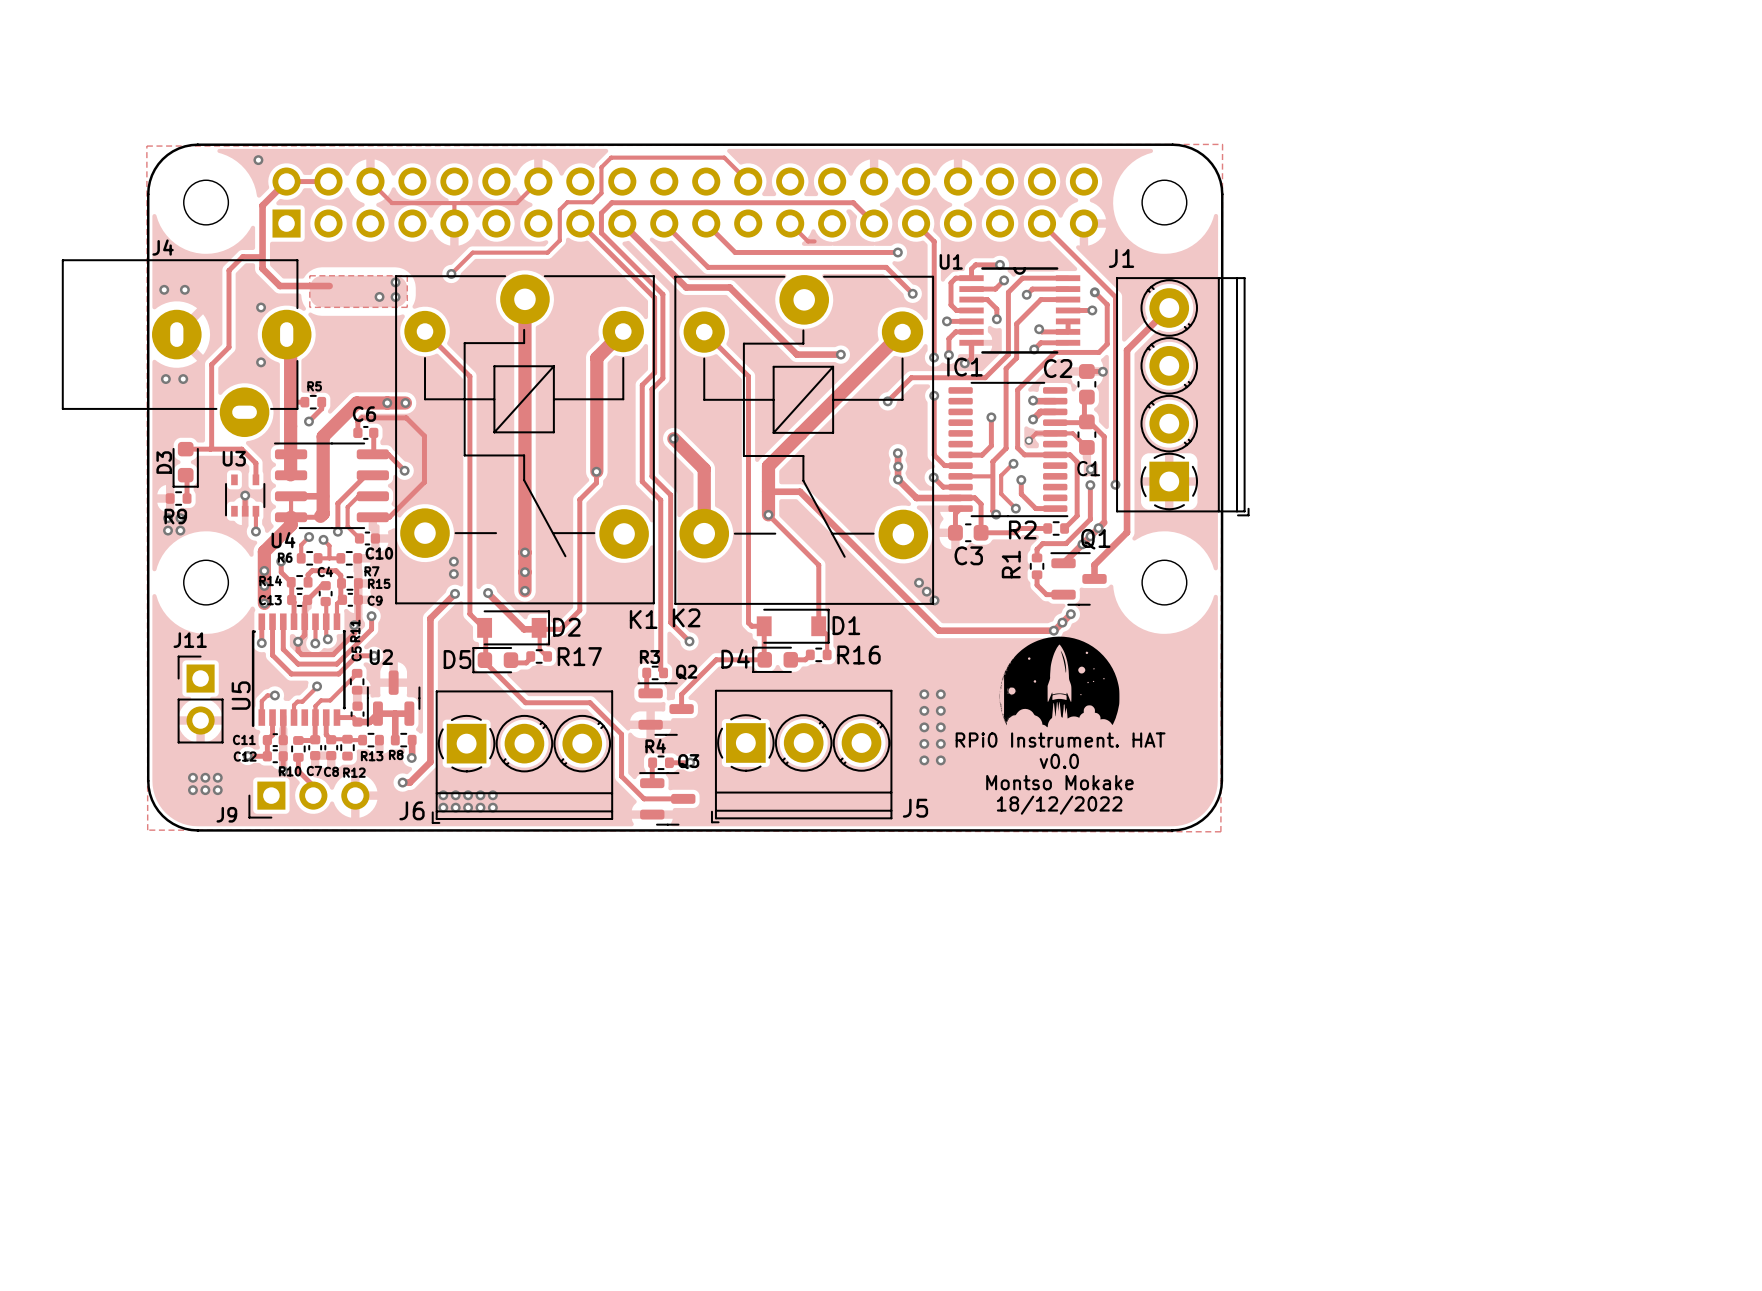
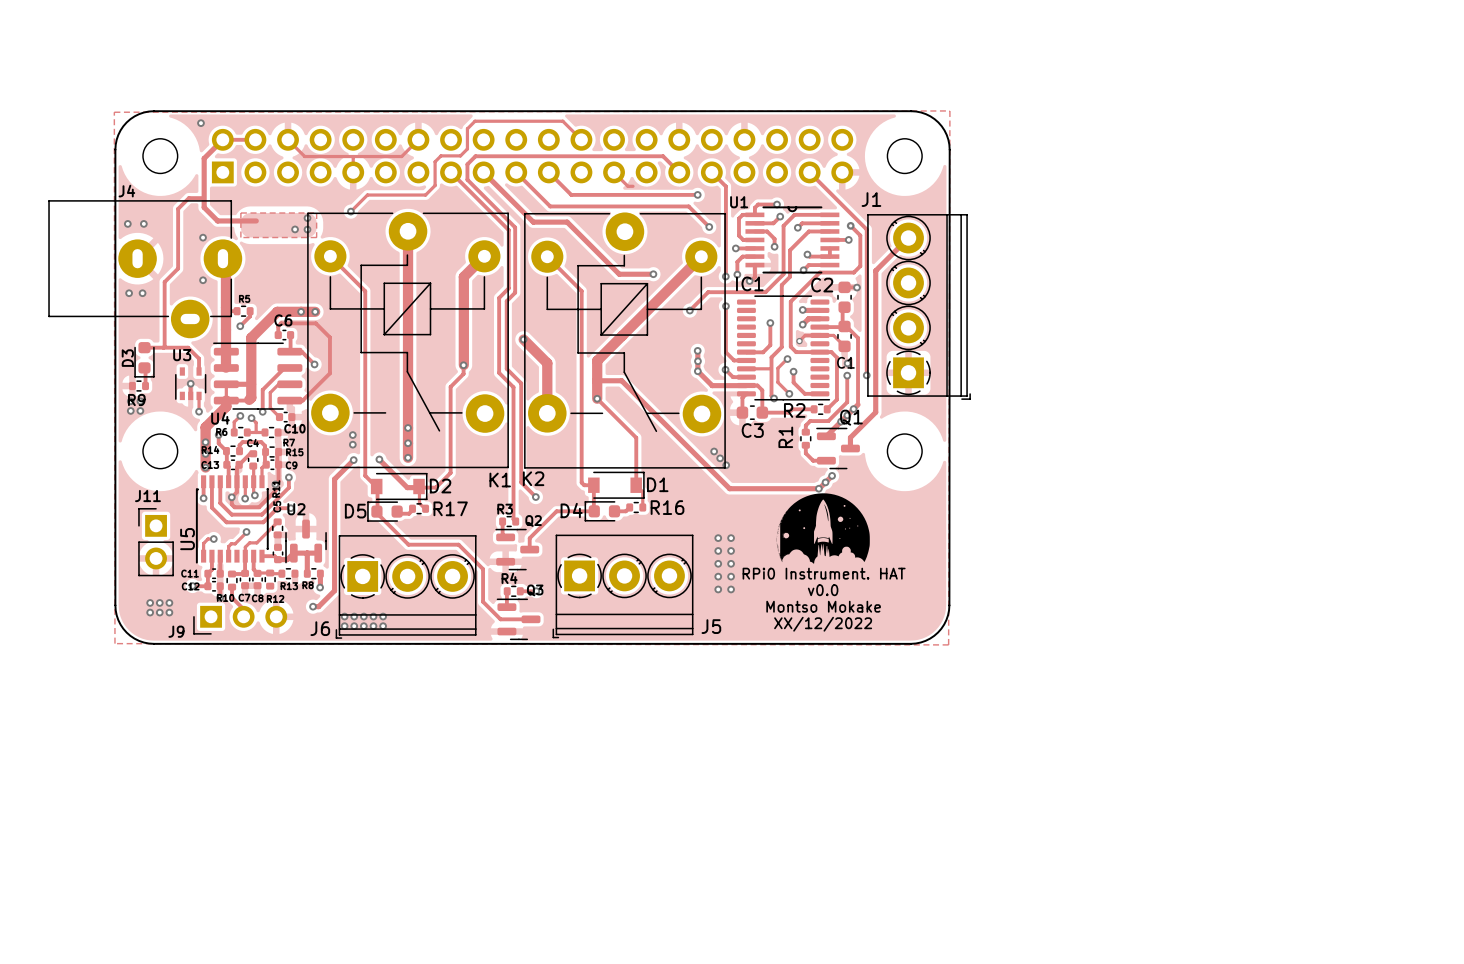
text: 18/12/2022 (1059, 805) -> XX/12/2022 (823, 624)

